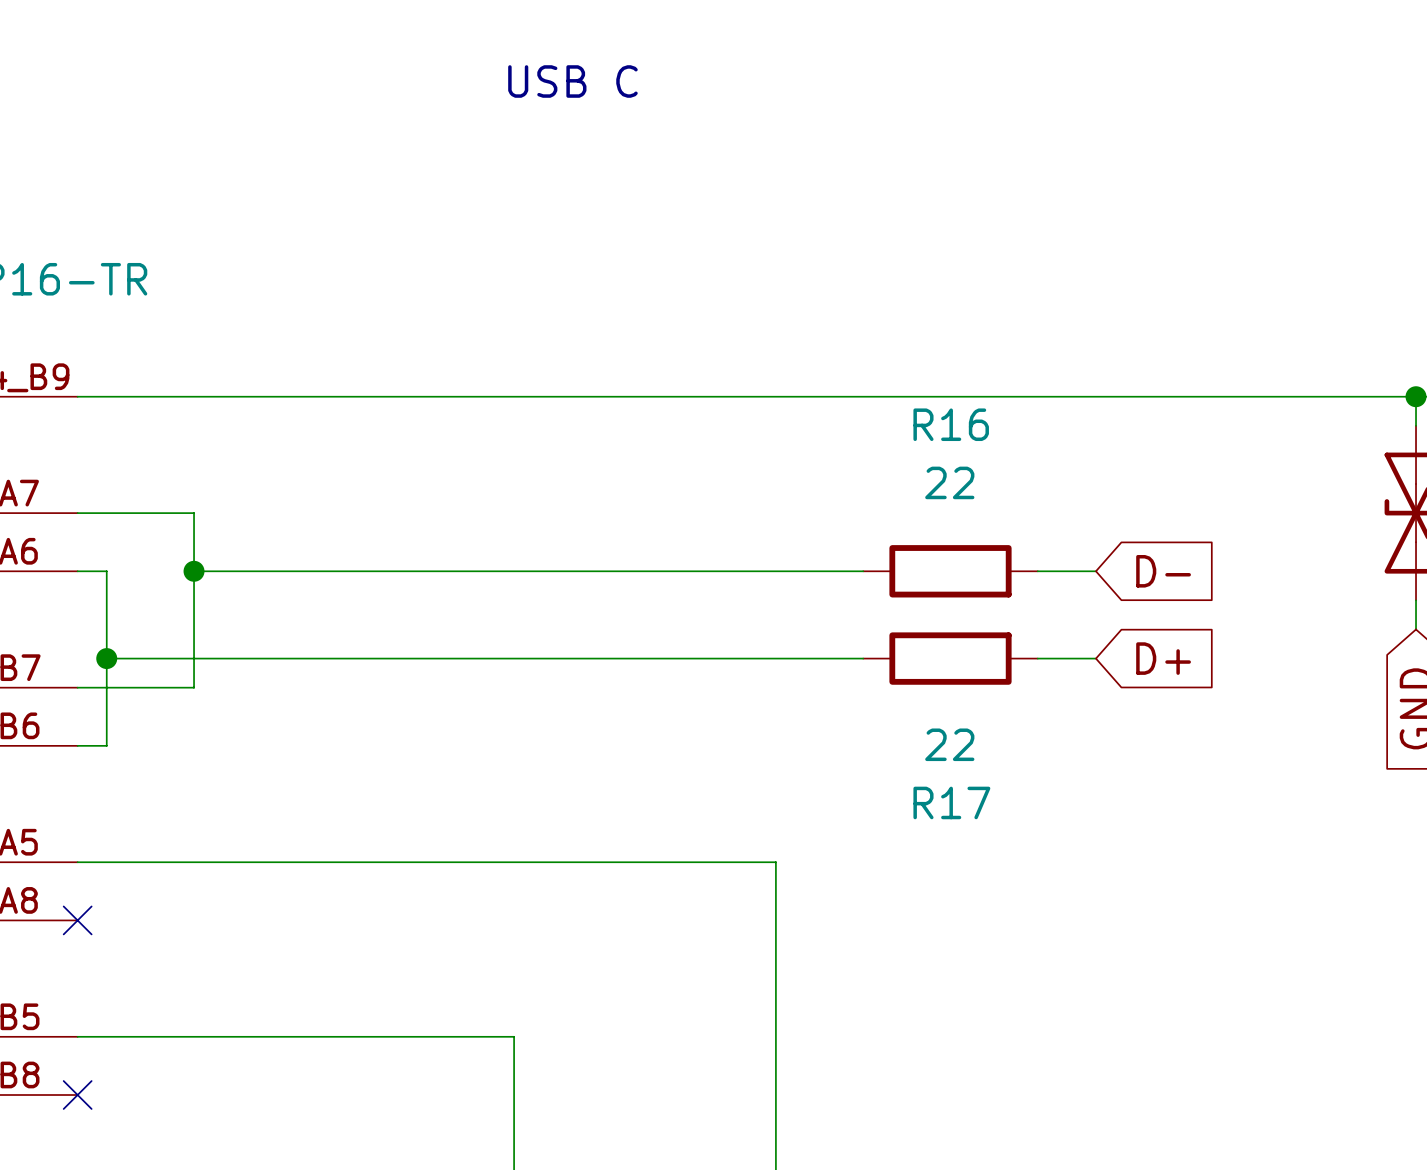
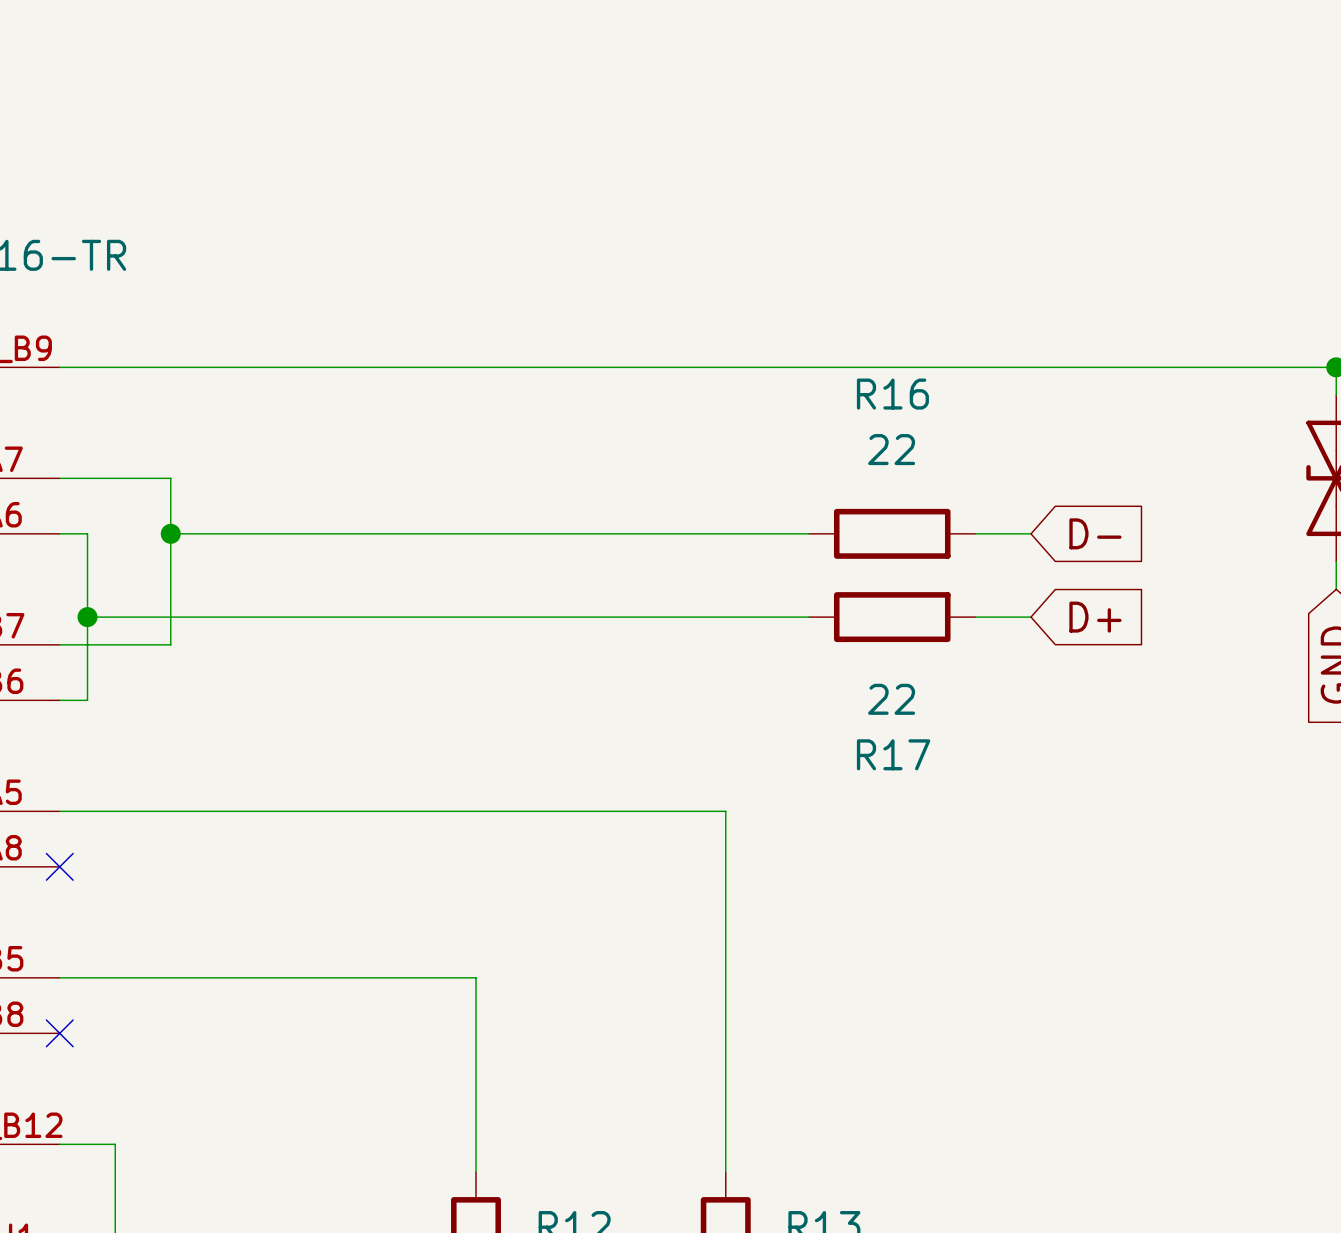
text: USB C (572, 81) -> none

